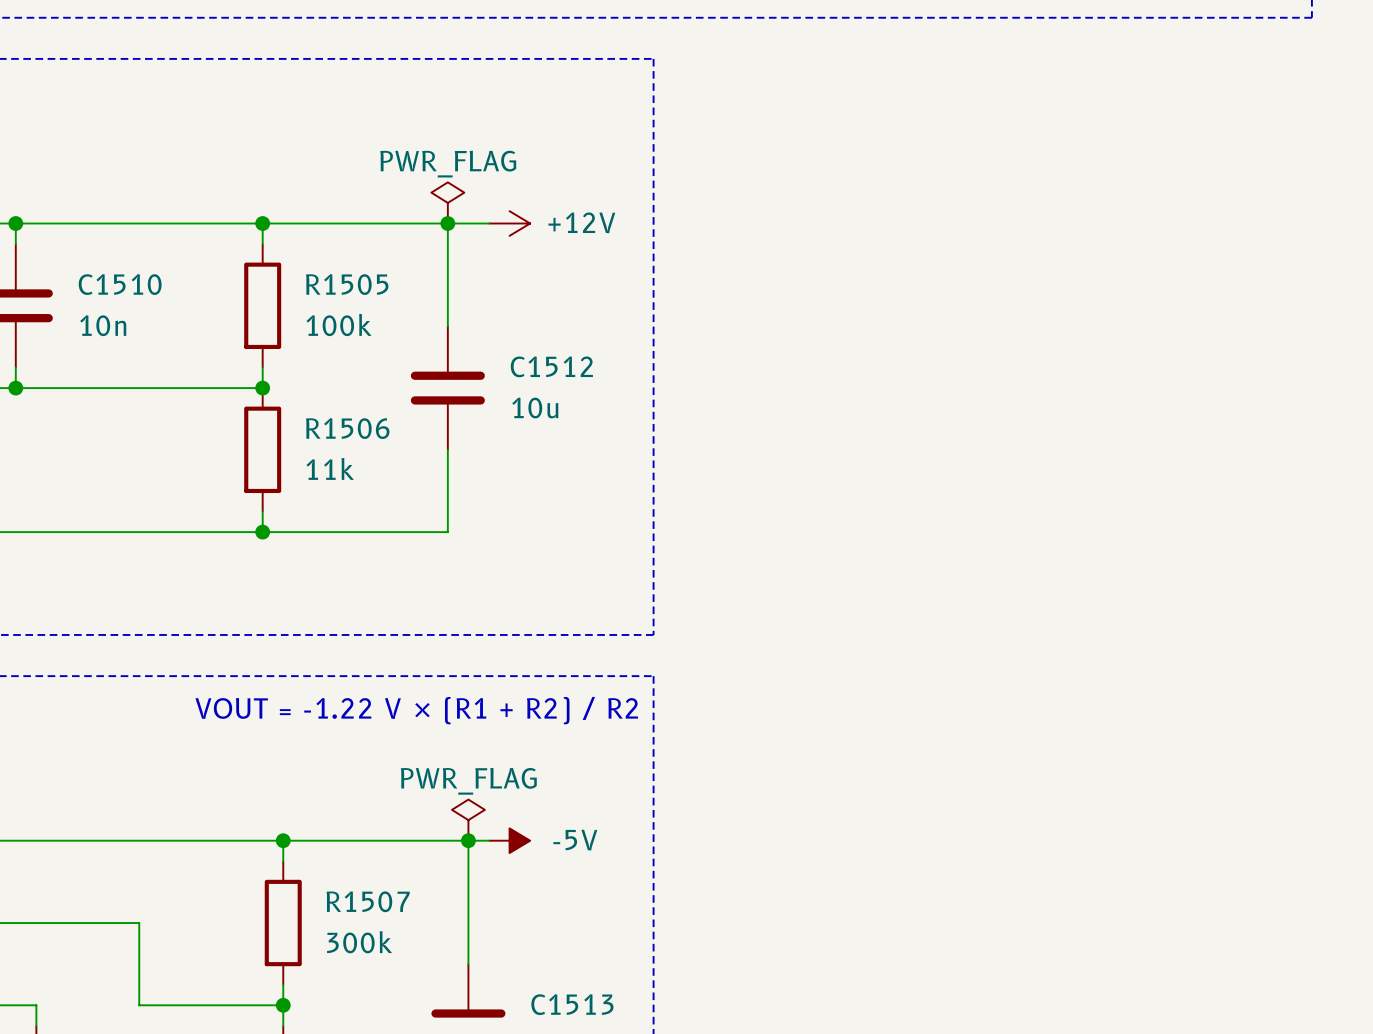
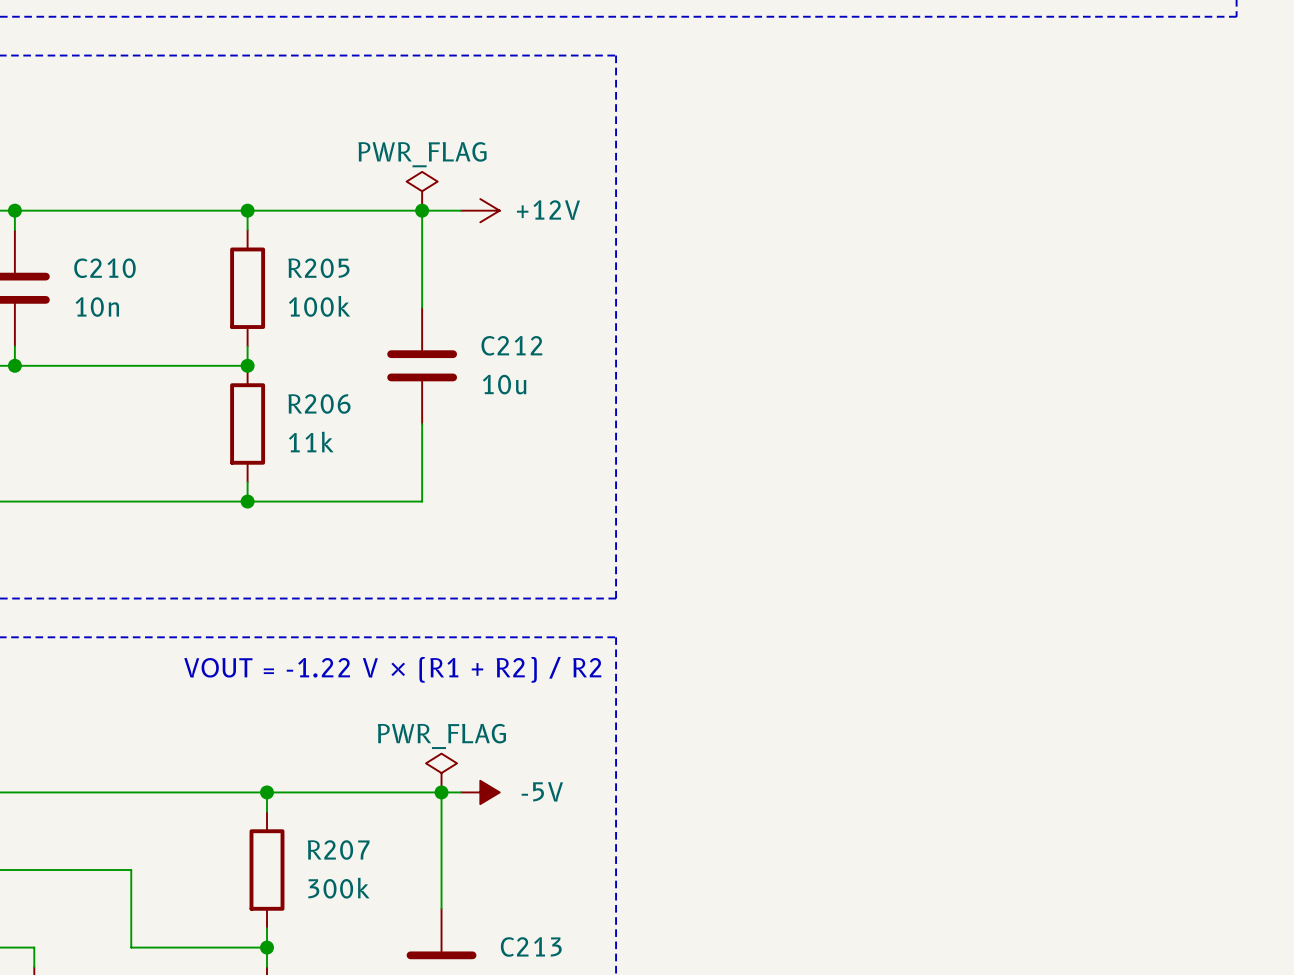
C1510 name: C1510 (120, 284) -> C210 (104, 268)
R1505 name: R1505 (347, 284) -> R205 (318, 268)
C1512 name: C1512 (551, 366) -> C212 (511, 345)
R1506 name: R1506 (347, 428) -> R206 (319, 403)
R1507 name: R1507 (368, 901) -> R207 (338, 850)
C1513 name: C1513 (572, 1004) -> C213 (531, 946)

